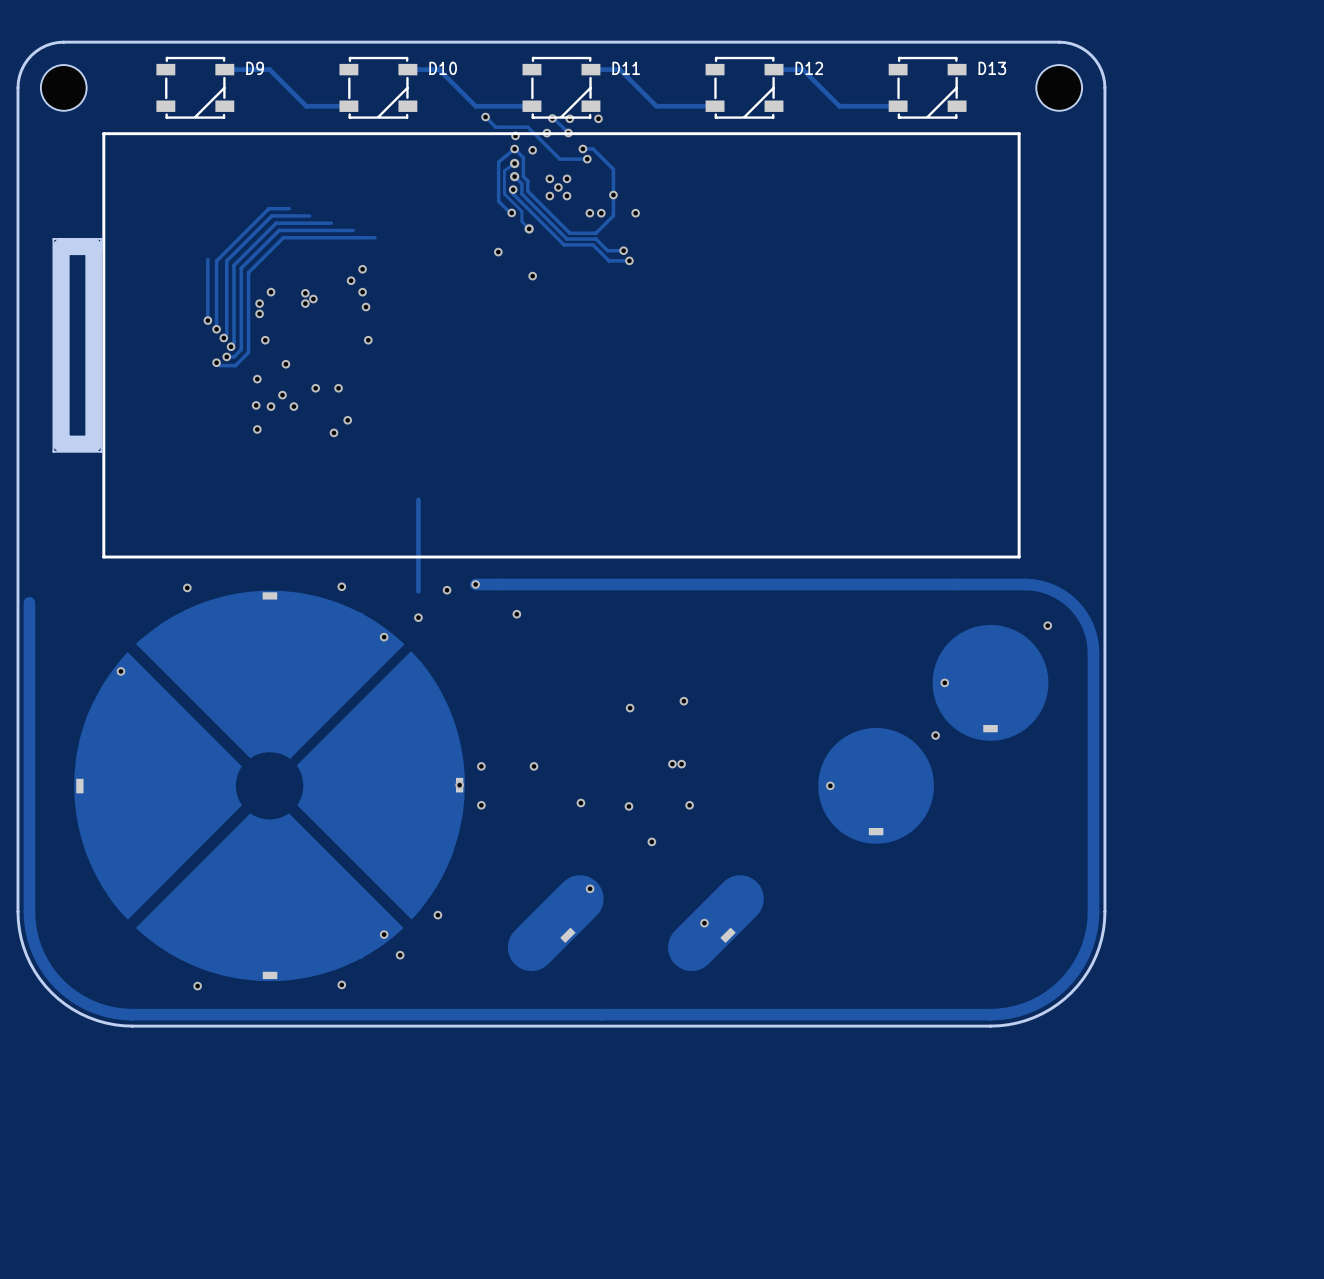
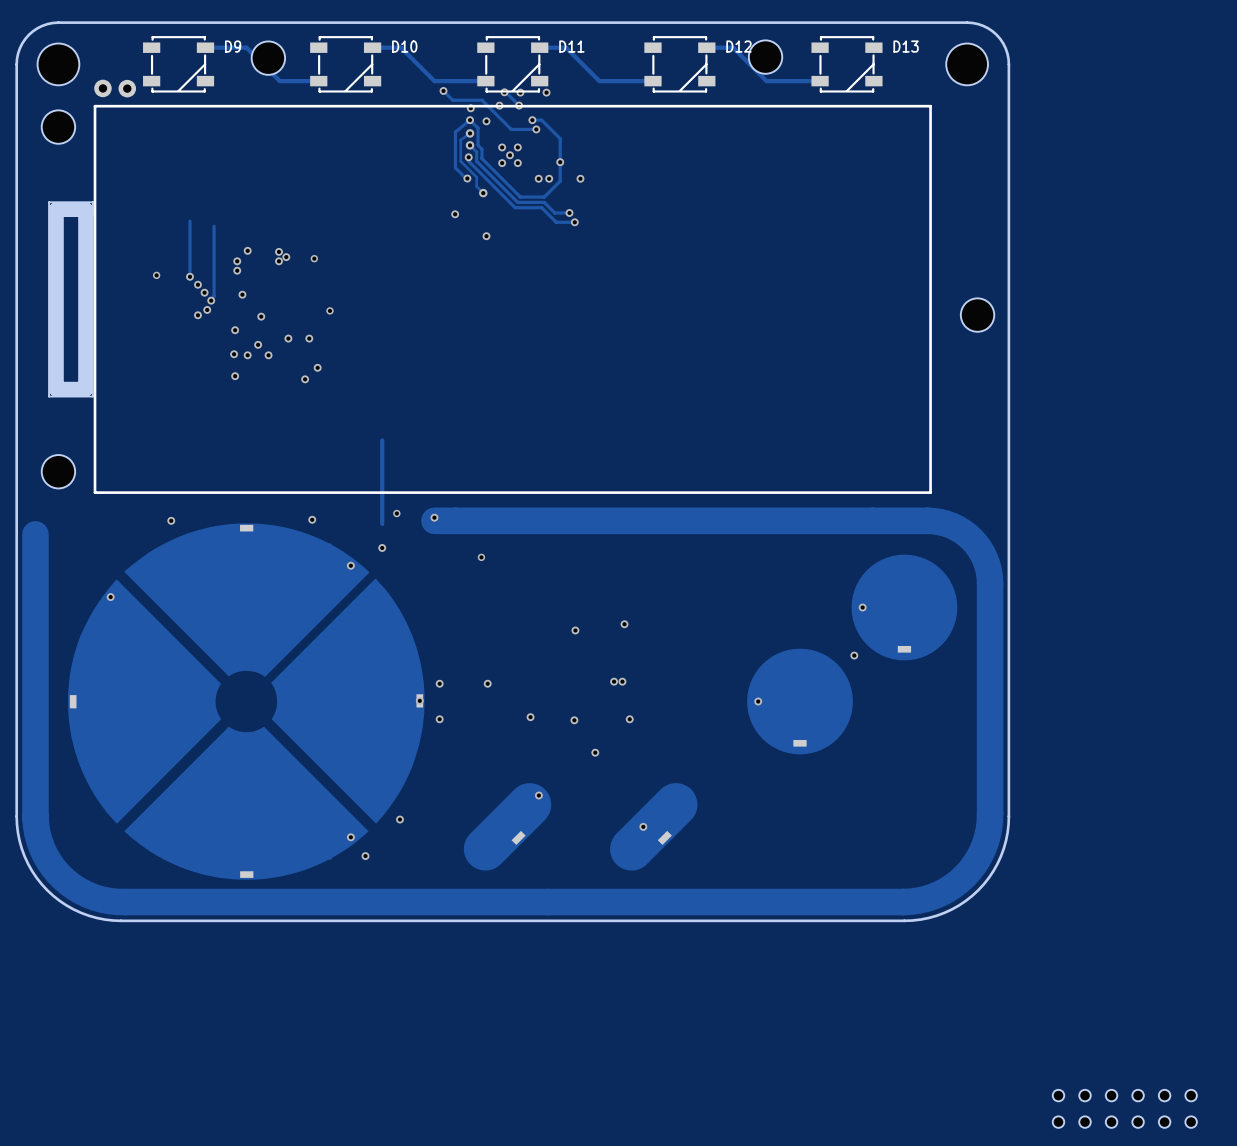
hole: none -> (765, 57)
hole: none -> (268, 58)
part: none -> (115, 88)
hole: none -> (58, 127)
track: (289, 208) (268, 208) (216, 261) (216, 329) -> none
track: (309, 215) (271, 215) (226, 261) (226, 333) (223, 338) -> none
track: (331, 223) (276, 223) (234, 265) (234, 342) (231, 346) -> (214, 226) (214, 296) (210, 300)
track: (353, 230) (279, 230) (241, 268) (241, 349) (234, 356) (226, 356) -> none
track: (374, 237) (283, 237) (248, 272) (248, 352) (235, 365) (219, 365) (216, 362) -> none
via: (362, 269) -> none
via: (351, 280) -> none
via: (362, 292) -> none
via: none -> (314, 258)
via: (366, 307) -> none
via: none -> (156, 275)
via: (368, 340) -> none
via: none -> (330, 310)
hole: none -> (977, 315)
hole: none -> (58, 471)
via: none -> (396, 513)
track: (498, 584) (475, 584) (1024, 584) (1044, 587) (1062, 596) (1077, 609) (1085, 620) (1092, 639) (1093, 653) (1093, 920) (1087, 946) (1074, 970) (1056, 990) (1034, 1005) (1017, 1011) (990, 1014) (132, 1014) (114, 1013) (97, 1008) (73, 996) (53, 977) (39, 955) (30, 929) (29, 602) -> none
track: none -> (455, 520) (434, 520) (927, 520) (945, 523) (962, 531) (971, 539) (982, 553) (987, 565) (990, 583) (989, 821) (985, 844) (974, 864) (964, 876) (946, 890) (925, 898) (903, 902) (125, 902) (95, 897) (74, 887) (57, 872) (44, 854) (37, 832) (35, 817) (35, 534)
via: (447, 590) -> none
via: (516, 614) -> none
via: (1047, 625) -> none
via: none -> (481, 557)
via: (341, 984) -> none
via: (197, 986) -> none
part: none -> (1124, 1108)

